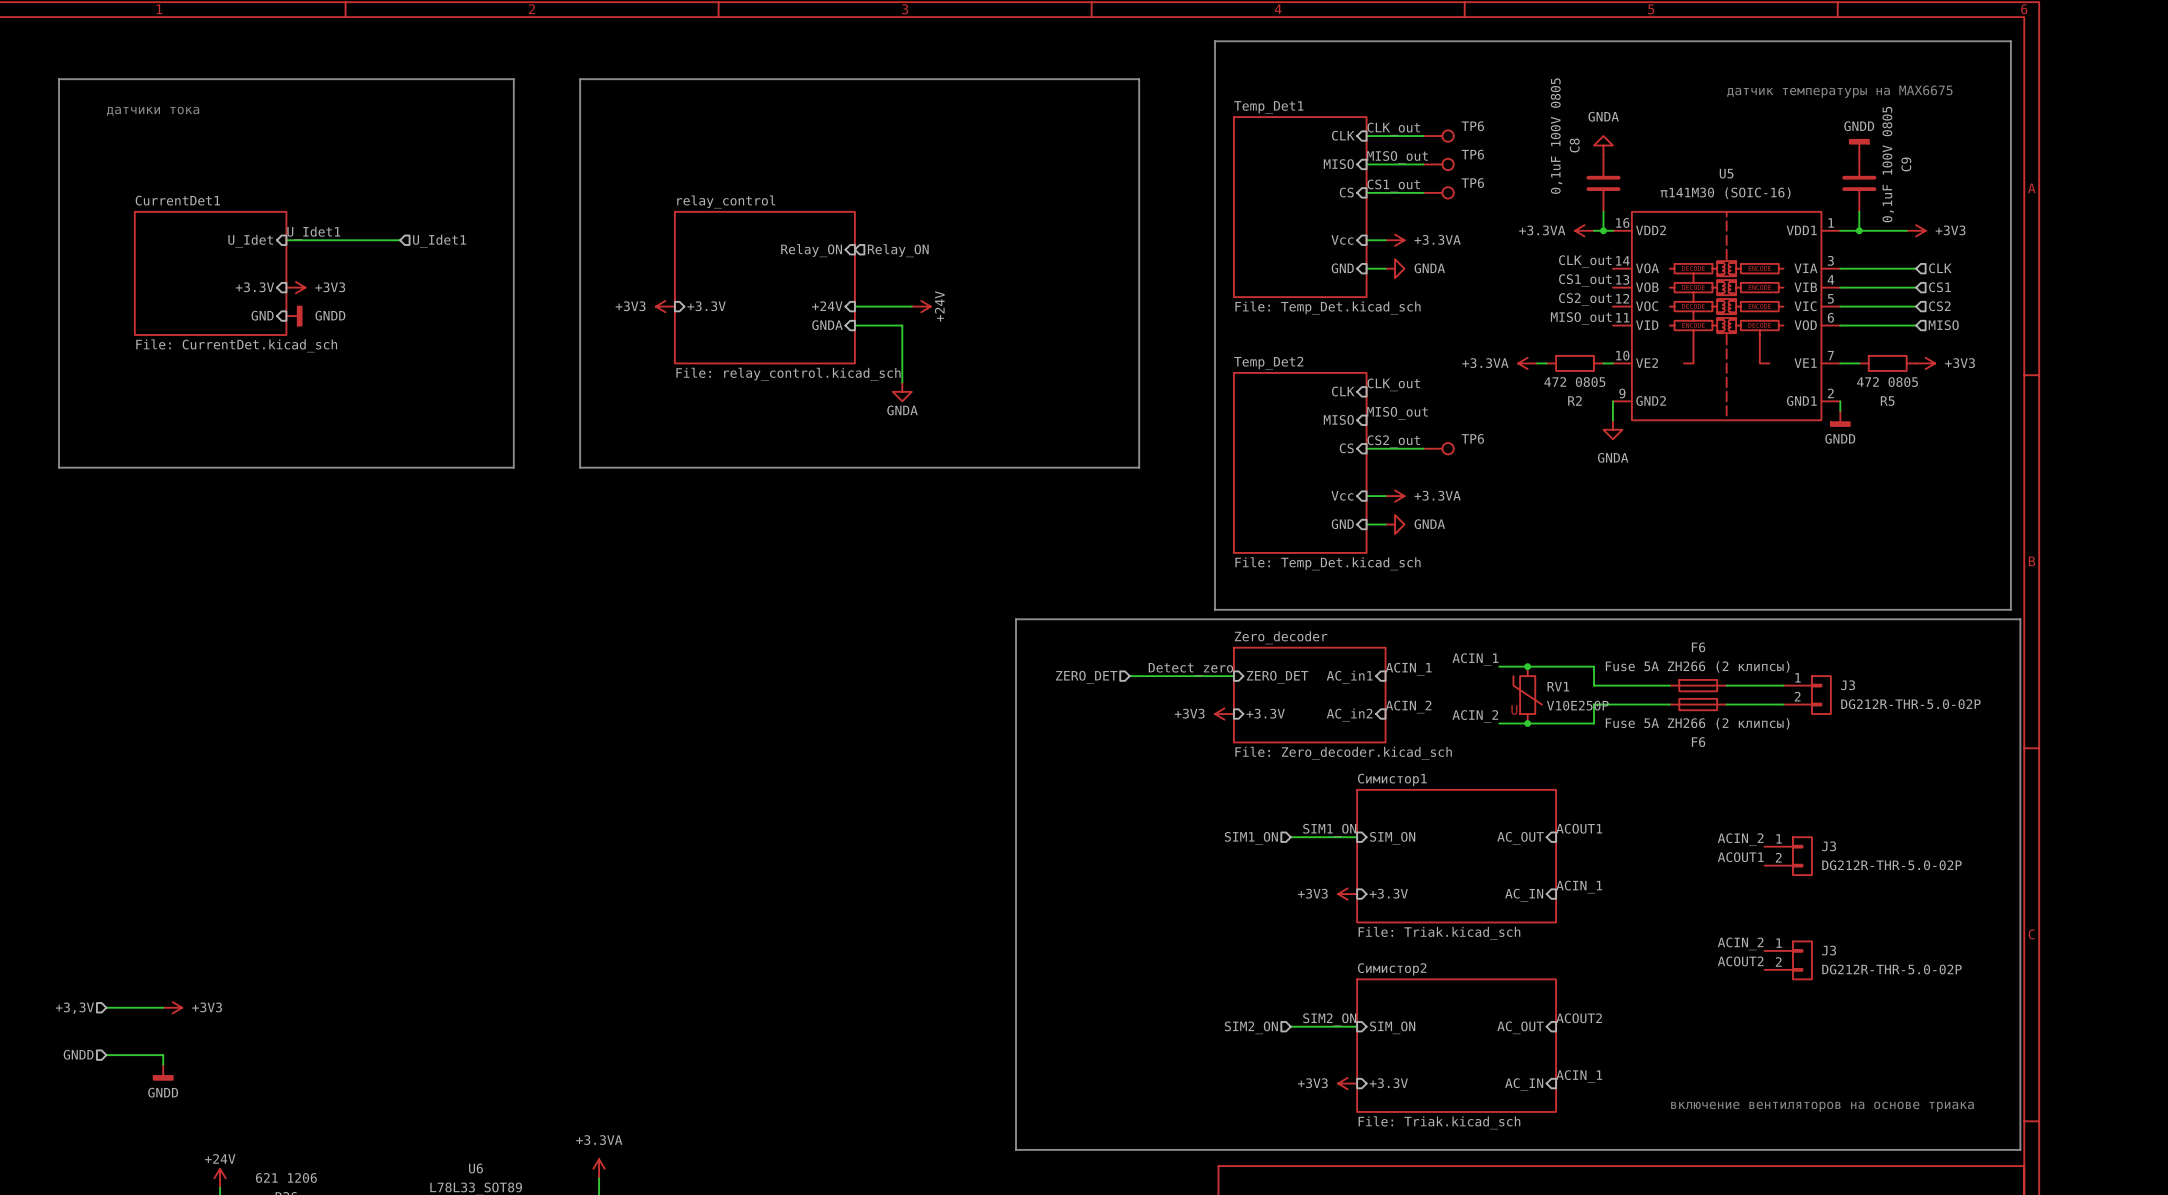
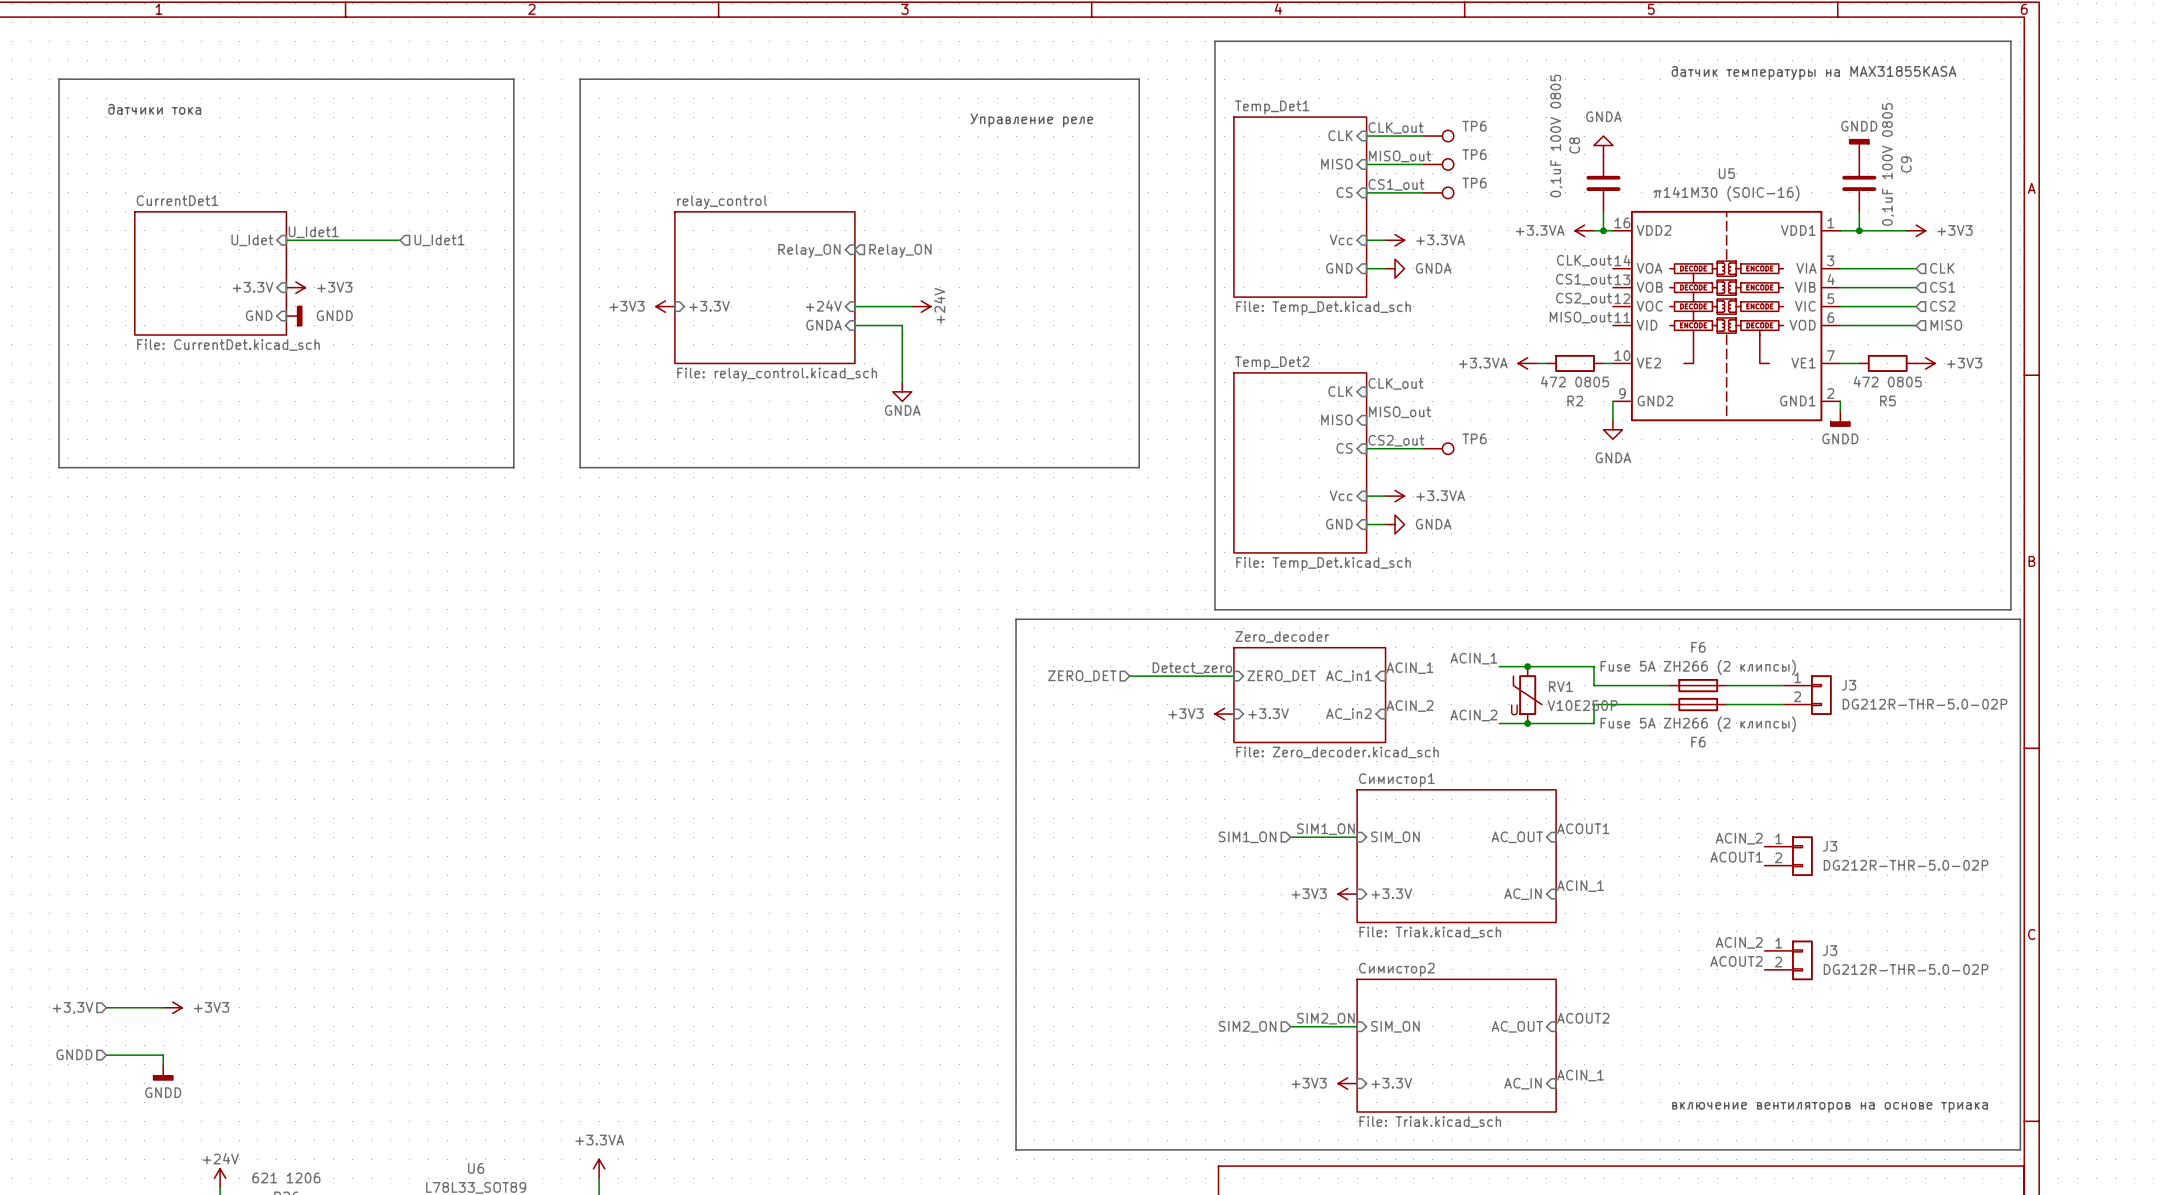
text: датчик температуры на MAX6675 (1839, 91) -> датчик температуры на MAX31855KASA (1814, 73)
text: none -> Управление реле (1031, 120)

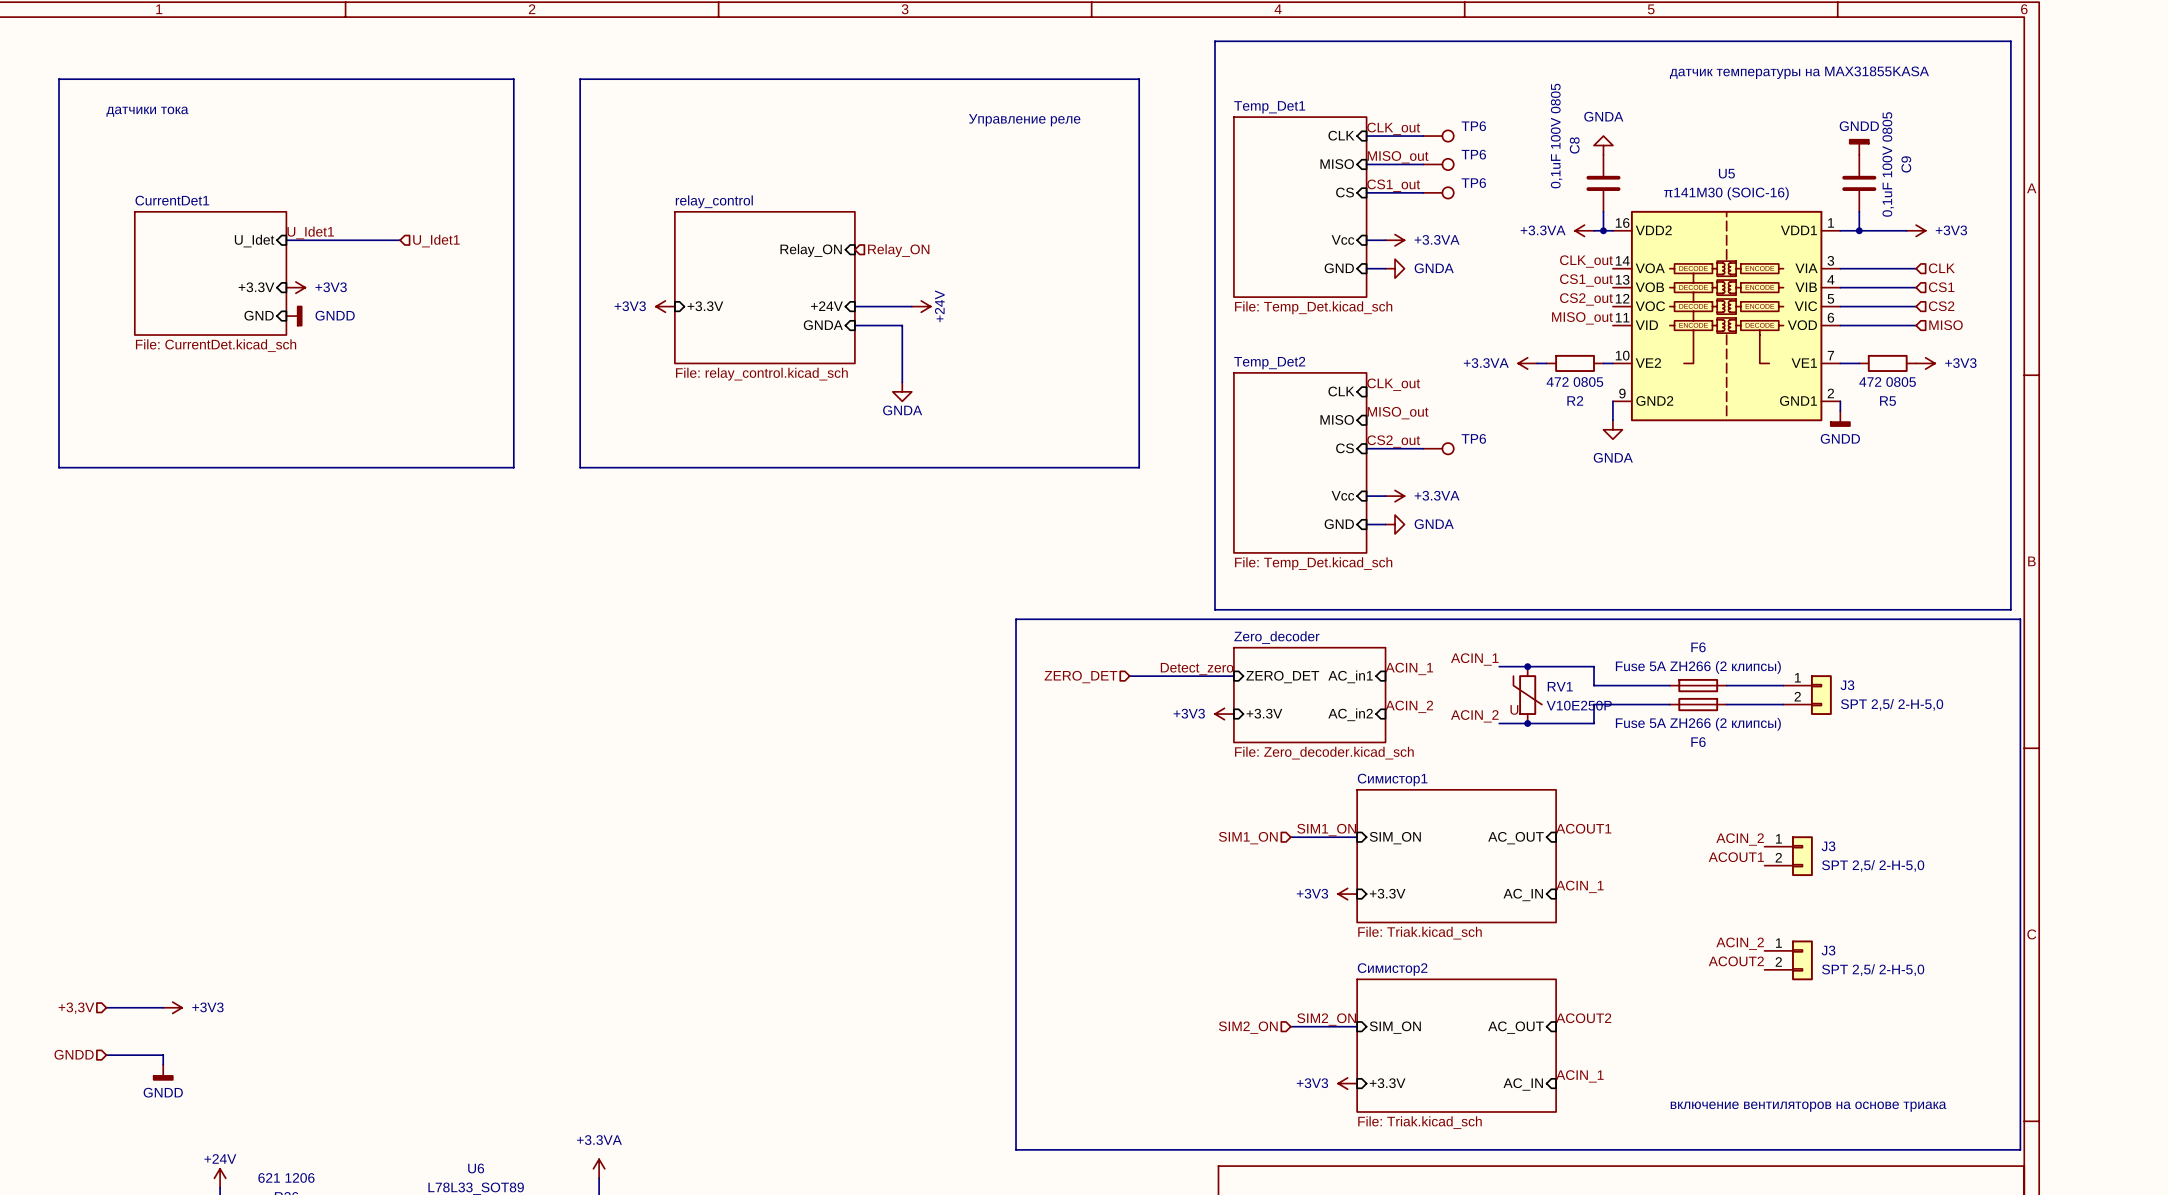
J3 value: DG212R-THR-5.0-02P (1925, 704) -> SPT 2,5/ 2-H-5,0 (1892, 704)
J3 value: DG212R-THR-5.0-02P (1906, 865) -> SPT 2,5/ 2-H-5,0 (1873, 865)
J3 value: DG212R-THR-5.0-02P (1906, 969) -> SPT 2,5/ 2-H-5,0 (1873, 970)

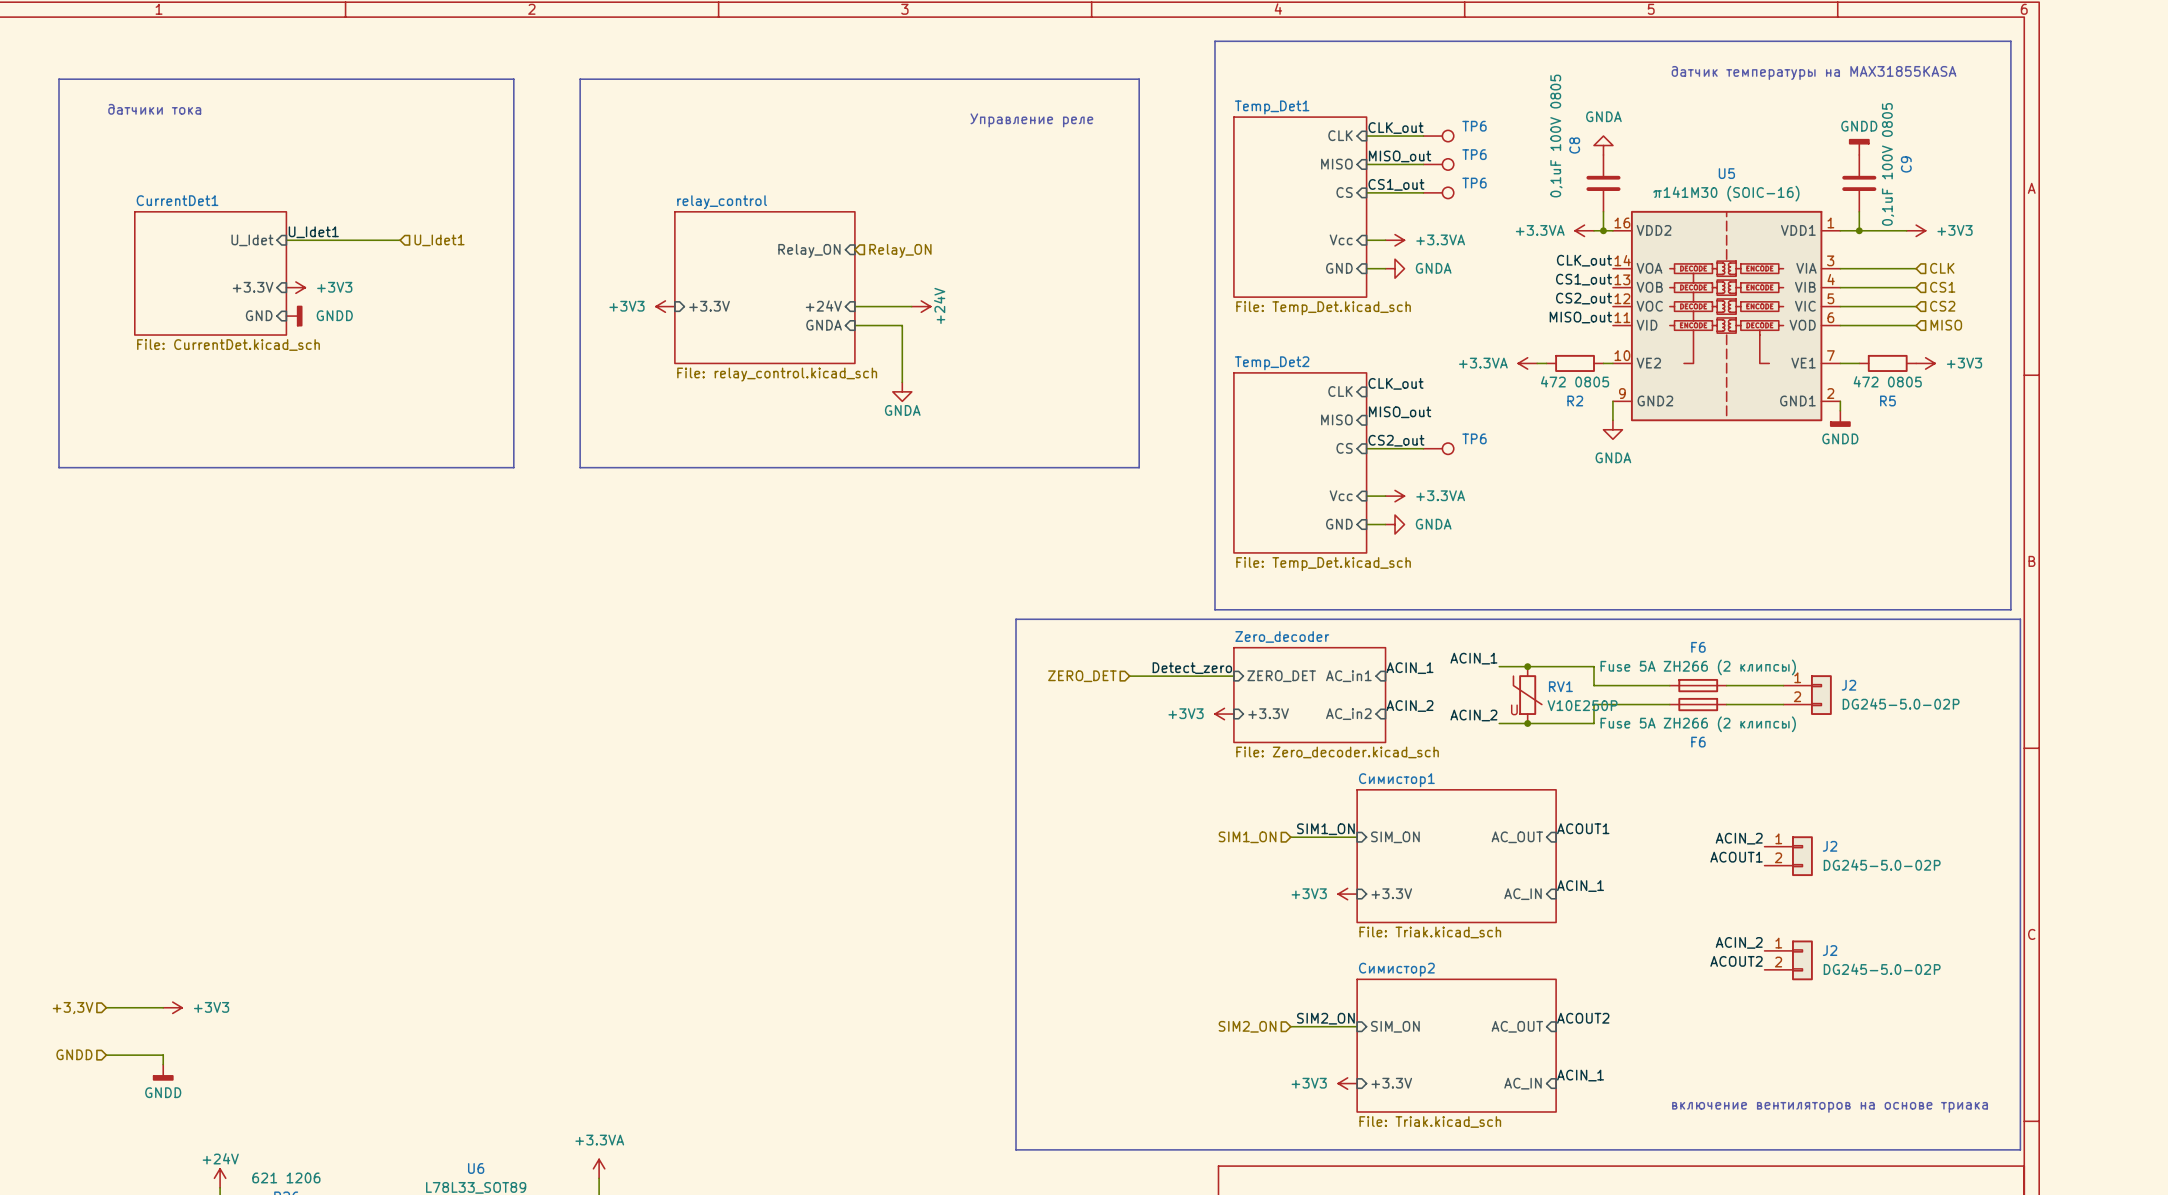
J3 name: J3 (1847, 685) -> J2 (1849, 685)
J3 value: SPT 2,5/ 2-H-5,0 (1892, 704) -> DG245-5.0-02P (1901, 703)
J3 name: J3 (1828, 846) -> J2 (1830, 846)
J3 value: SPT 2,5/ 2-H-5,0 (1873, 865) -> DG245-5.0-02P (1882, 865)
J3 name: J3 (1828, 950) -> J2 (1830, 950)
J3 value: SPT 2,5/ 2-H-5,0 (1873, 970) -> DG245-5.0-02P (1882, 969)

